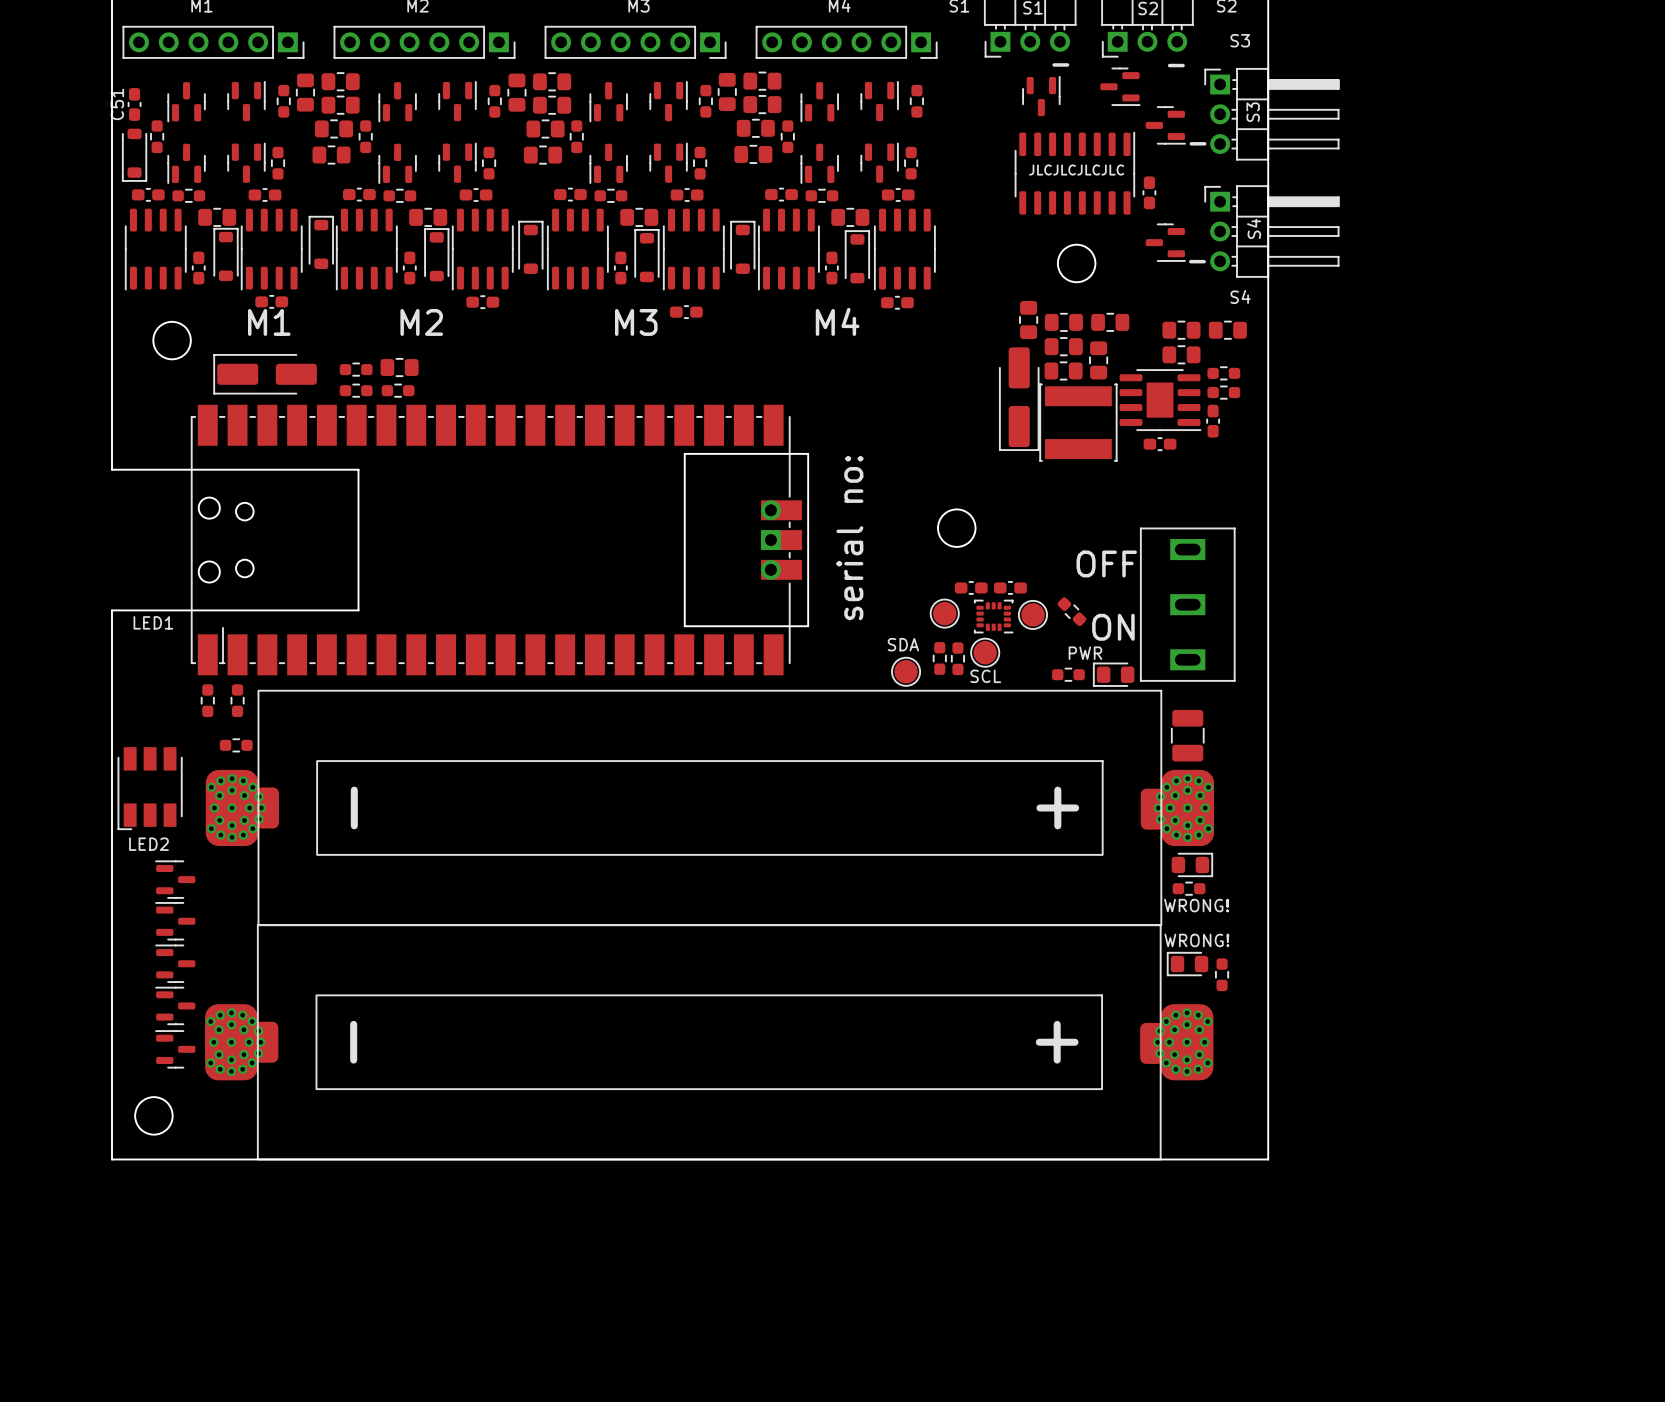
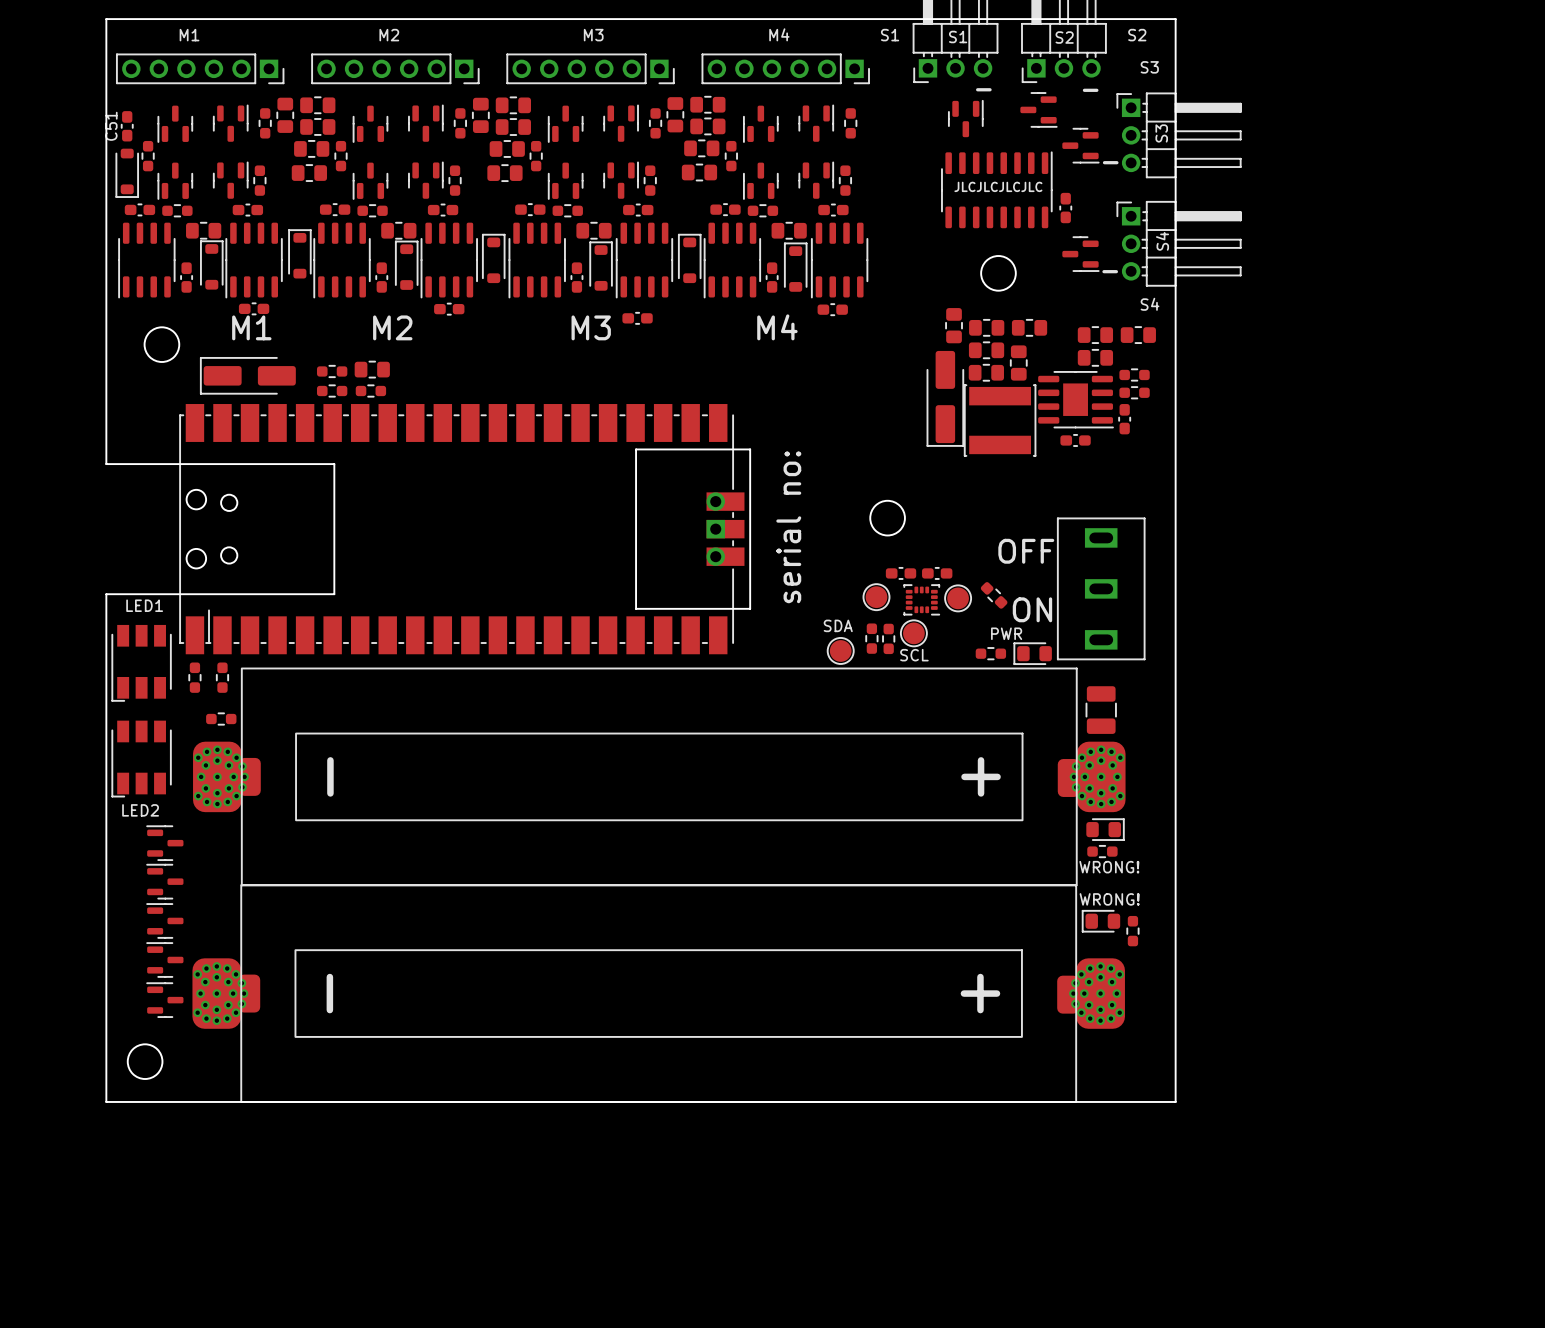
part: none -> (141, 663)

